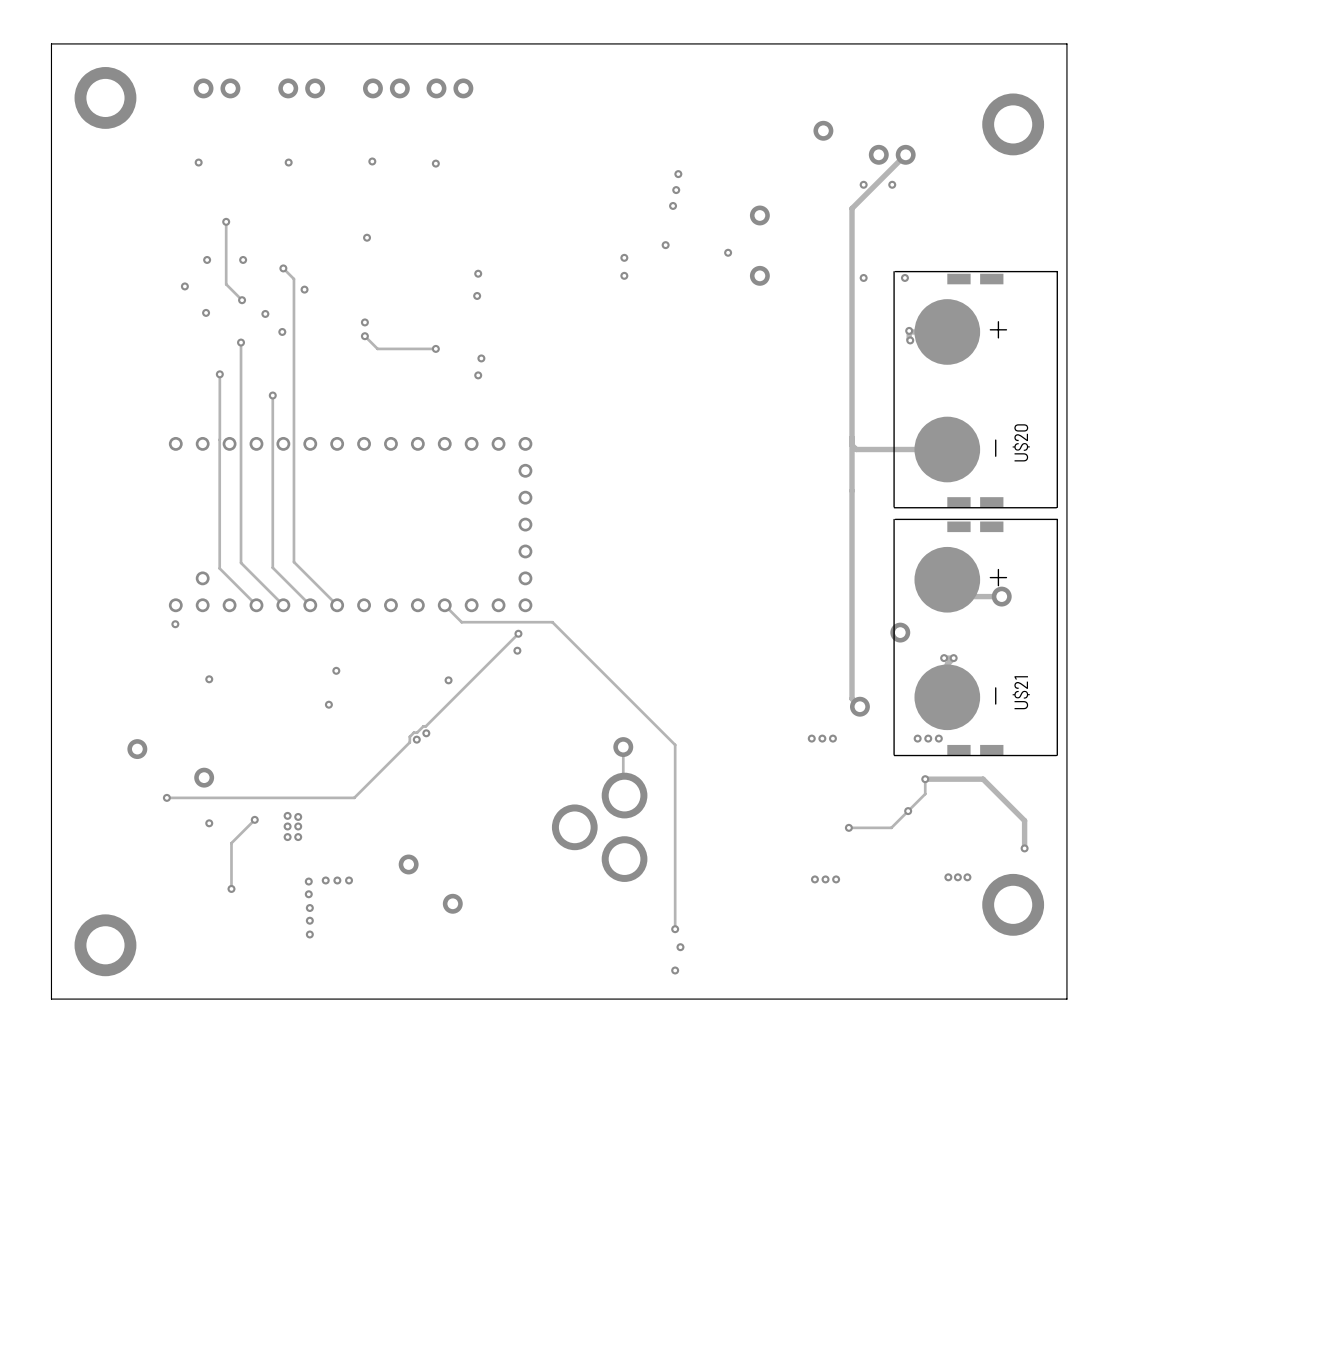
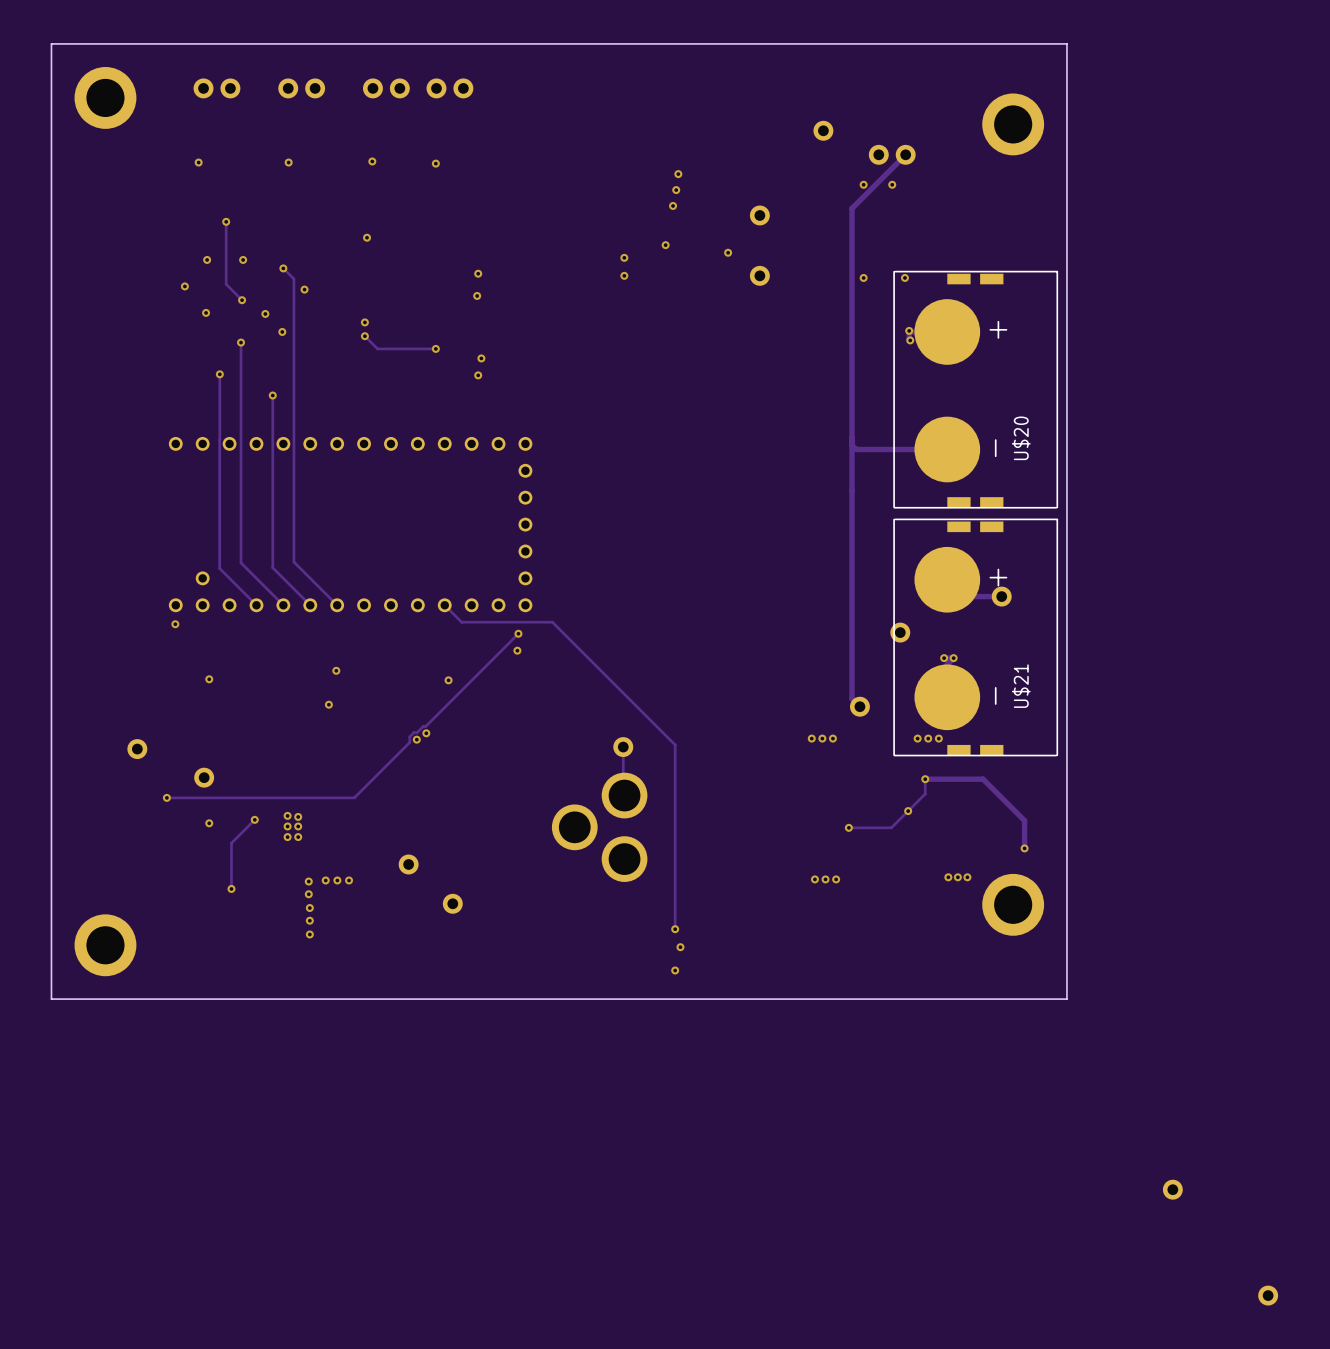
part: none -> (1172, 1189)
part: none -> (1268, 1295)

